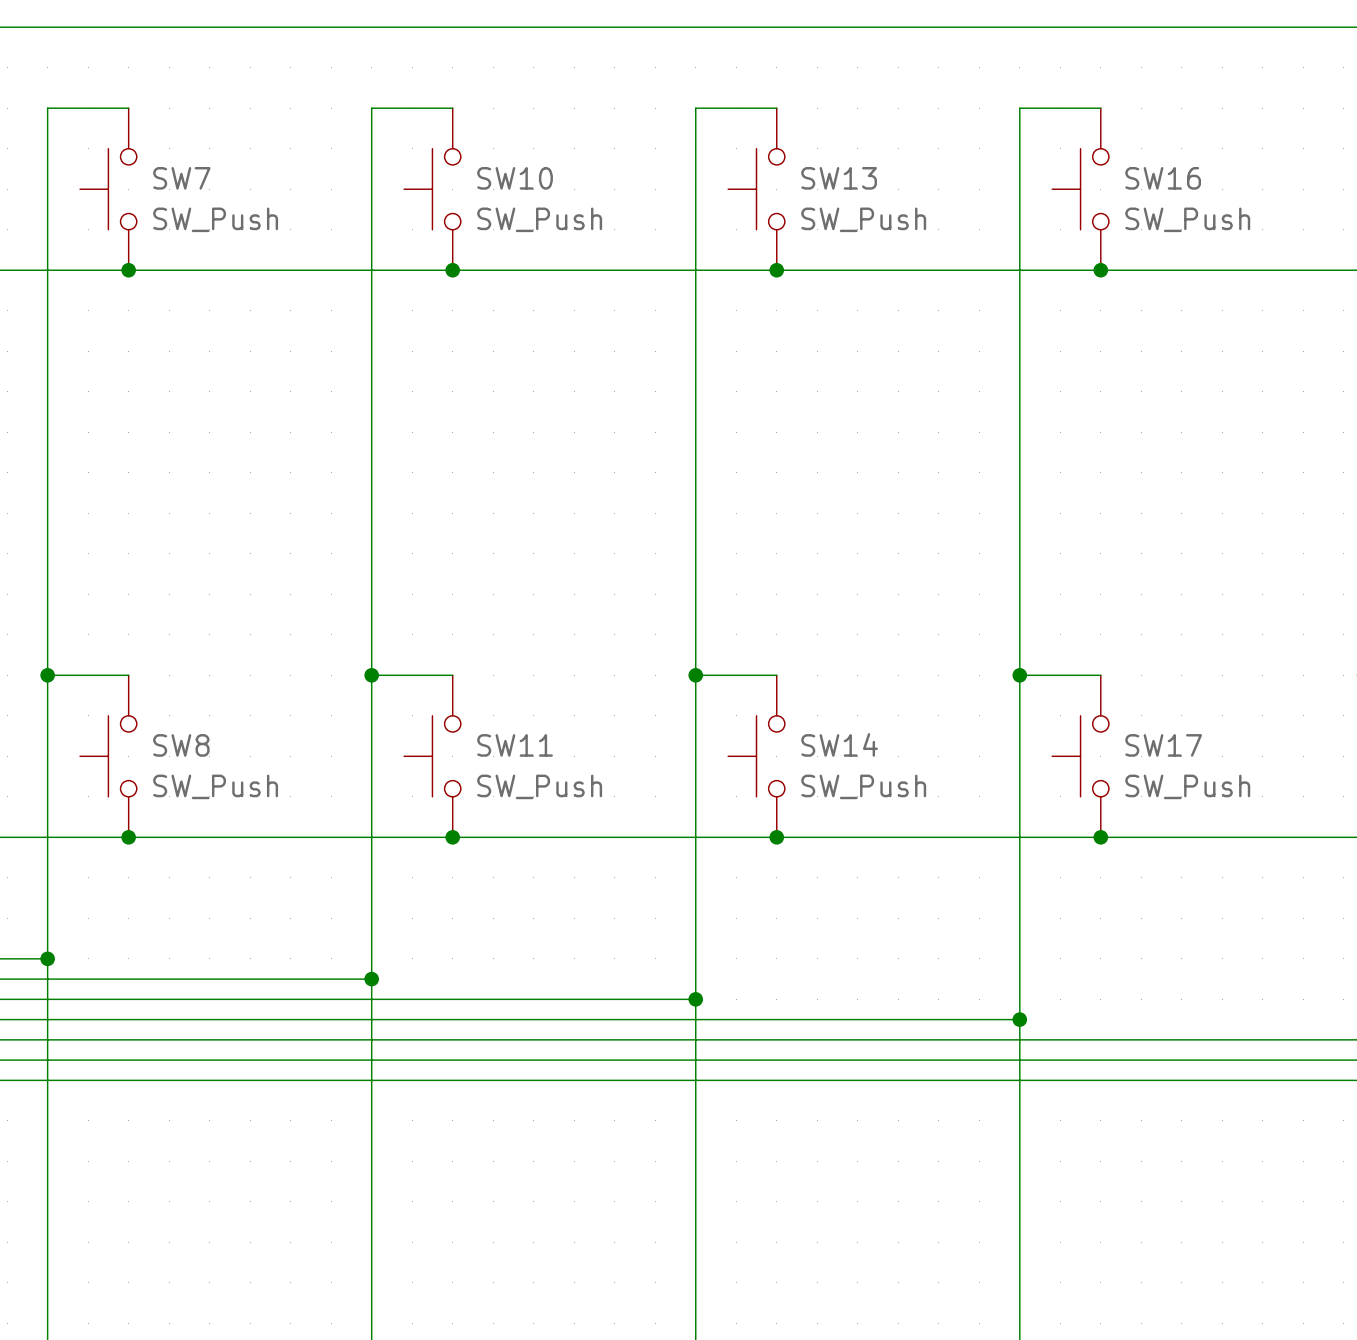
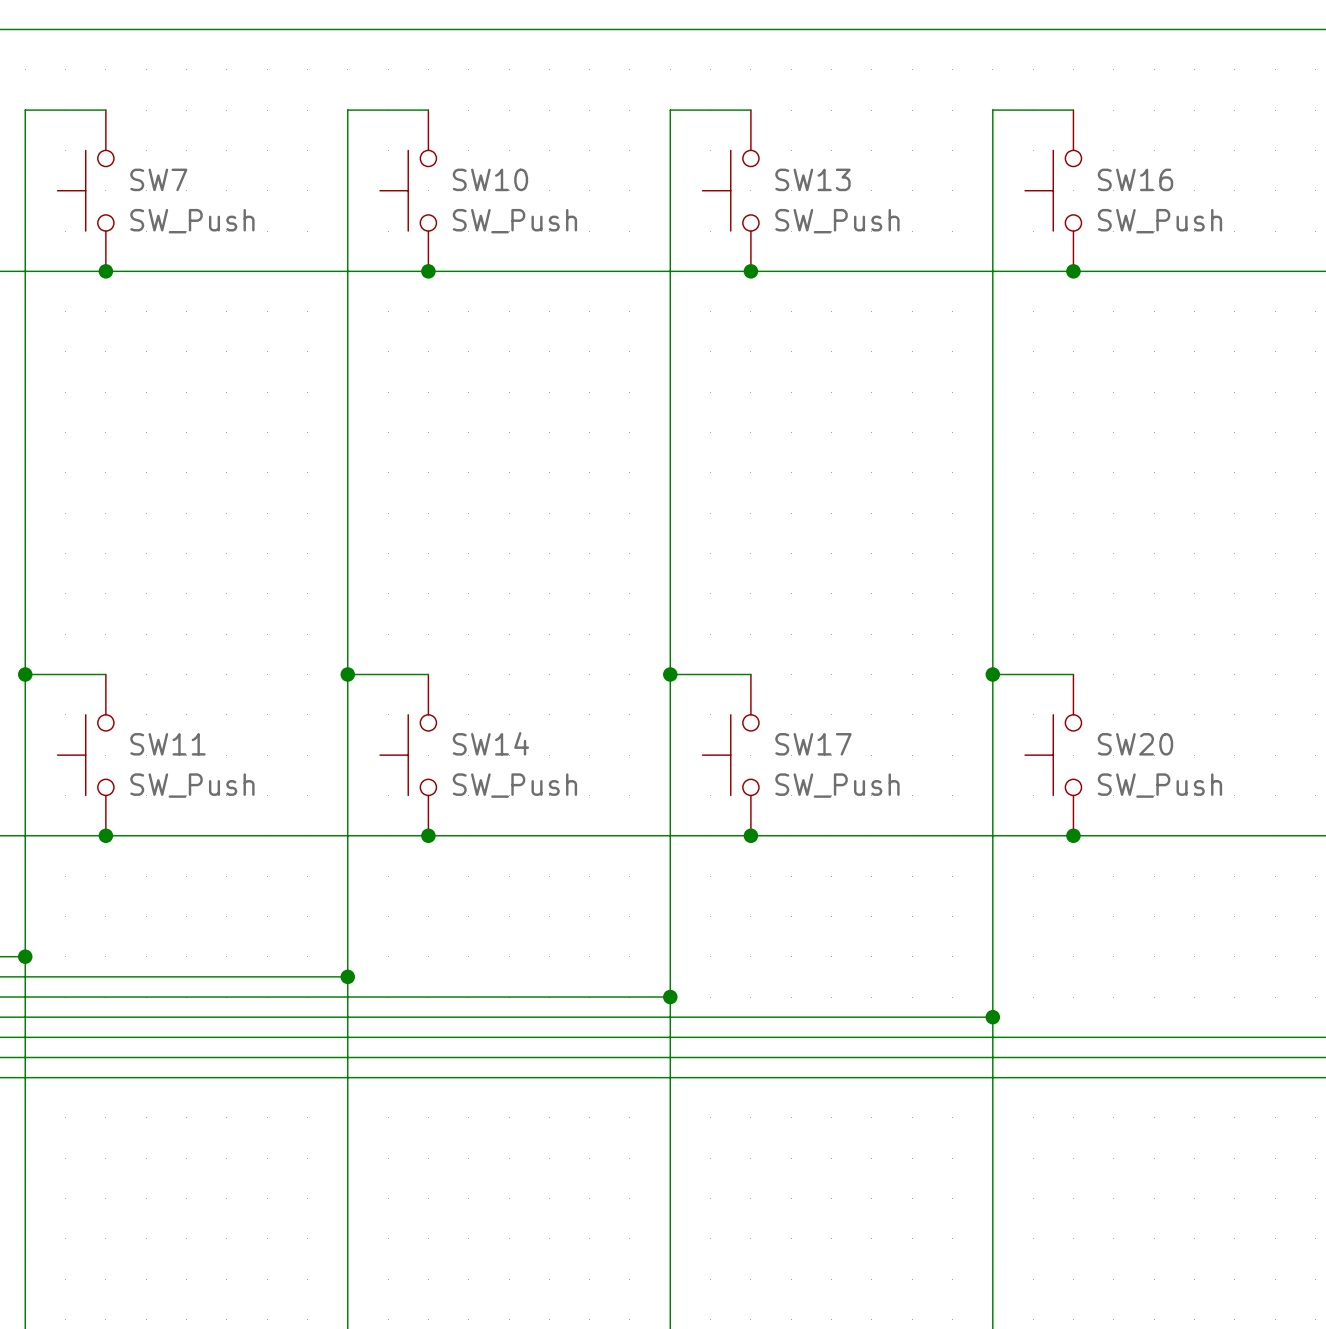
SW14 name: SW14 (839, 744) -> SW17 (813, 744)
SW8 name: SW8 (181, 745) -> SW11 (167, 744)
SW11 name: SW11 (515, 745) -> SW14 (490, 743)
SW17 name: SW17 (1163, 745) -> SW20 (1135, 744)

